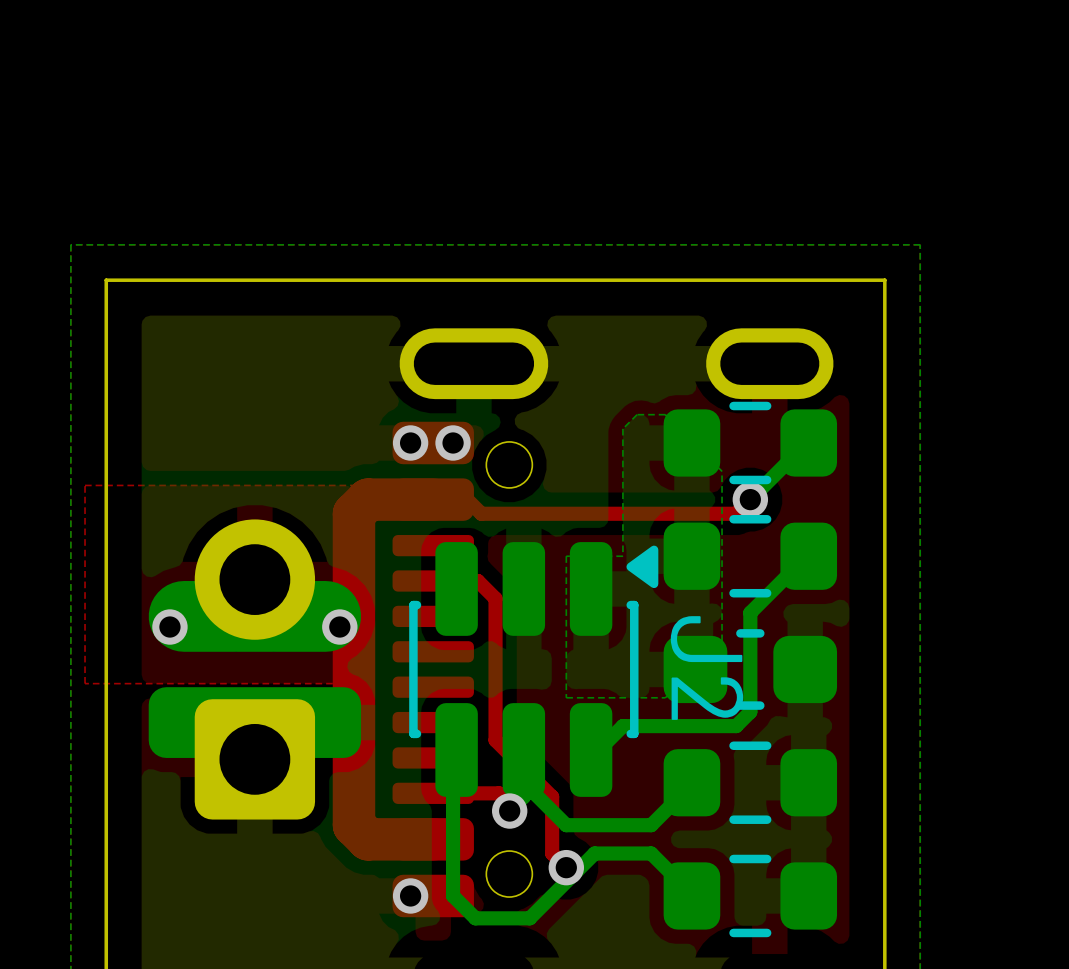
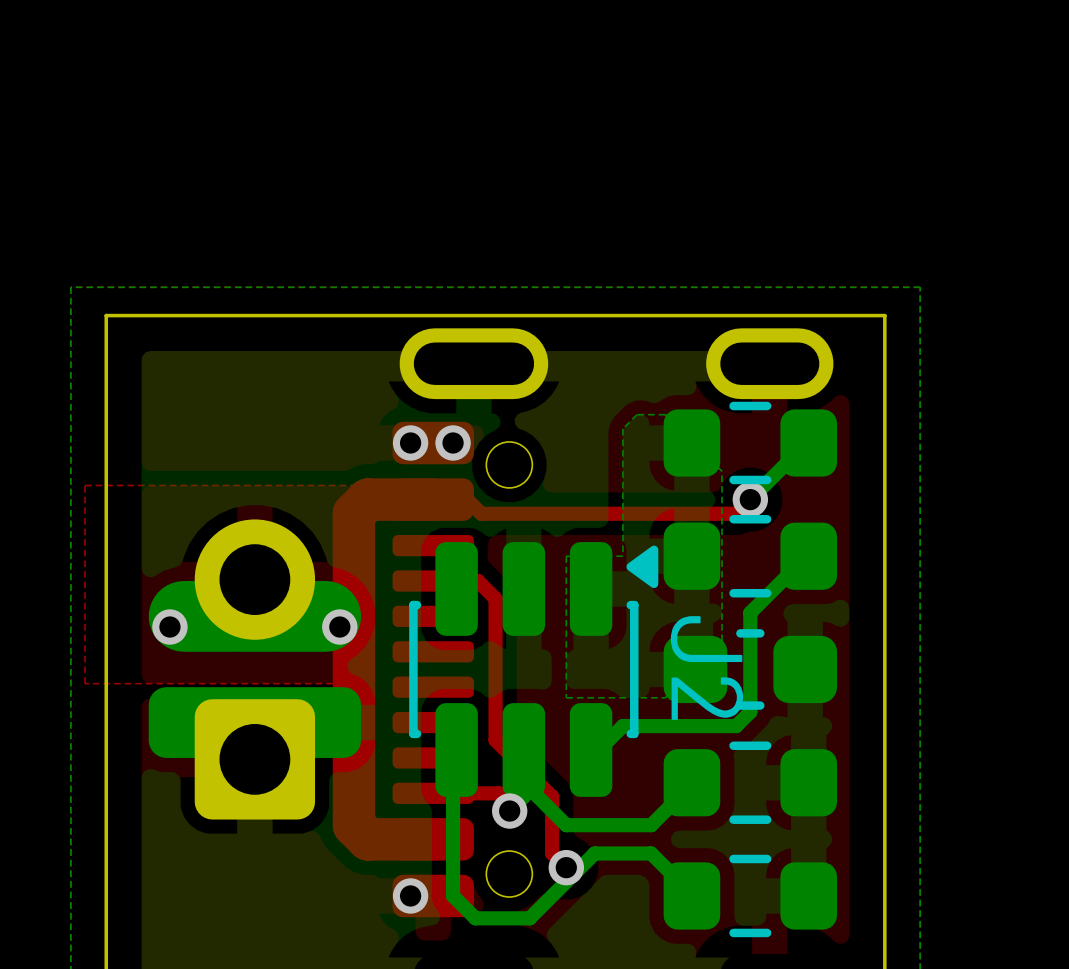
bottom zone outline: (920, 287) (920, 244) (70, 244) (70, 287) -> (920, 287) (70, 287)
board edge: (884, 315) (884, 280) (106, 280) (106, 315) -> (884, 315) (106, 315)

